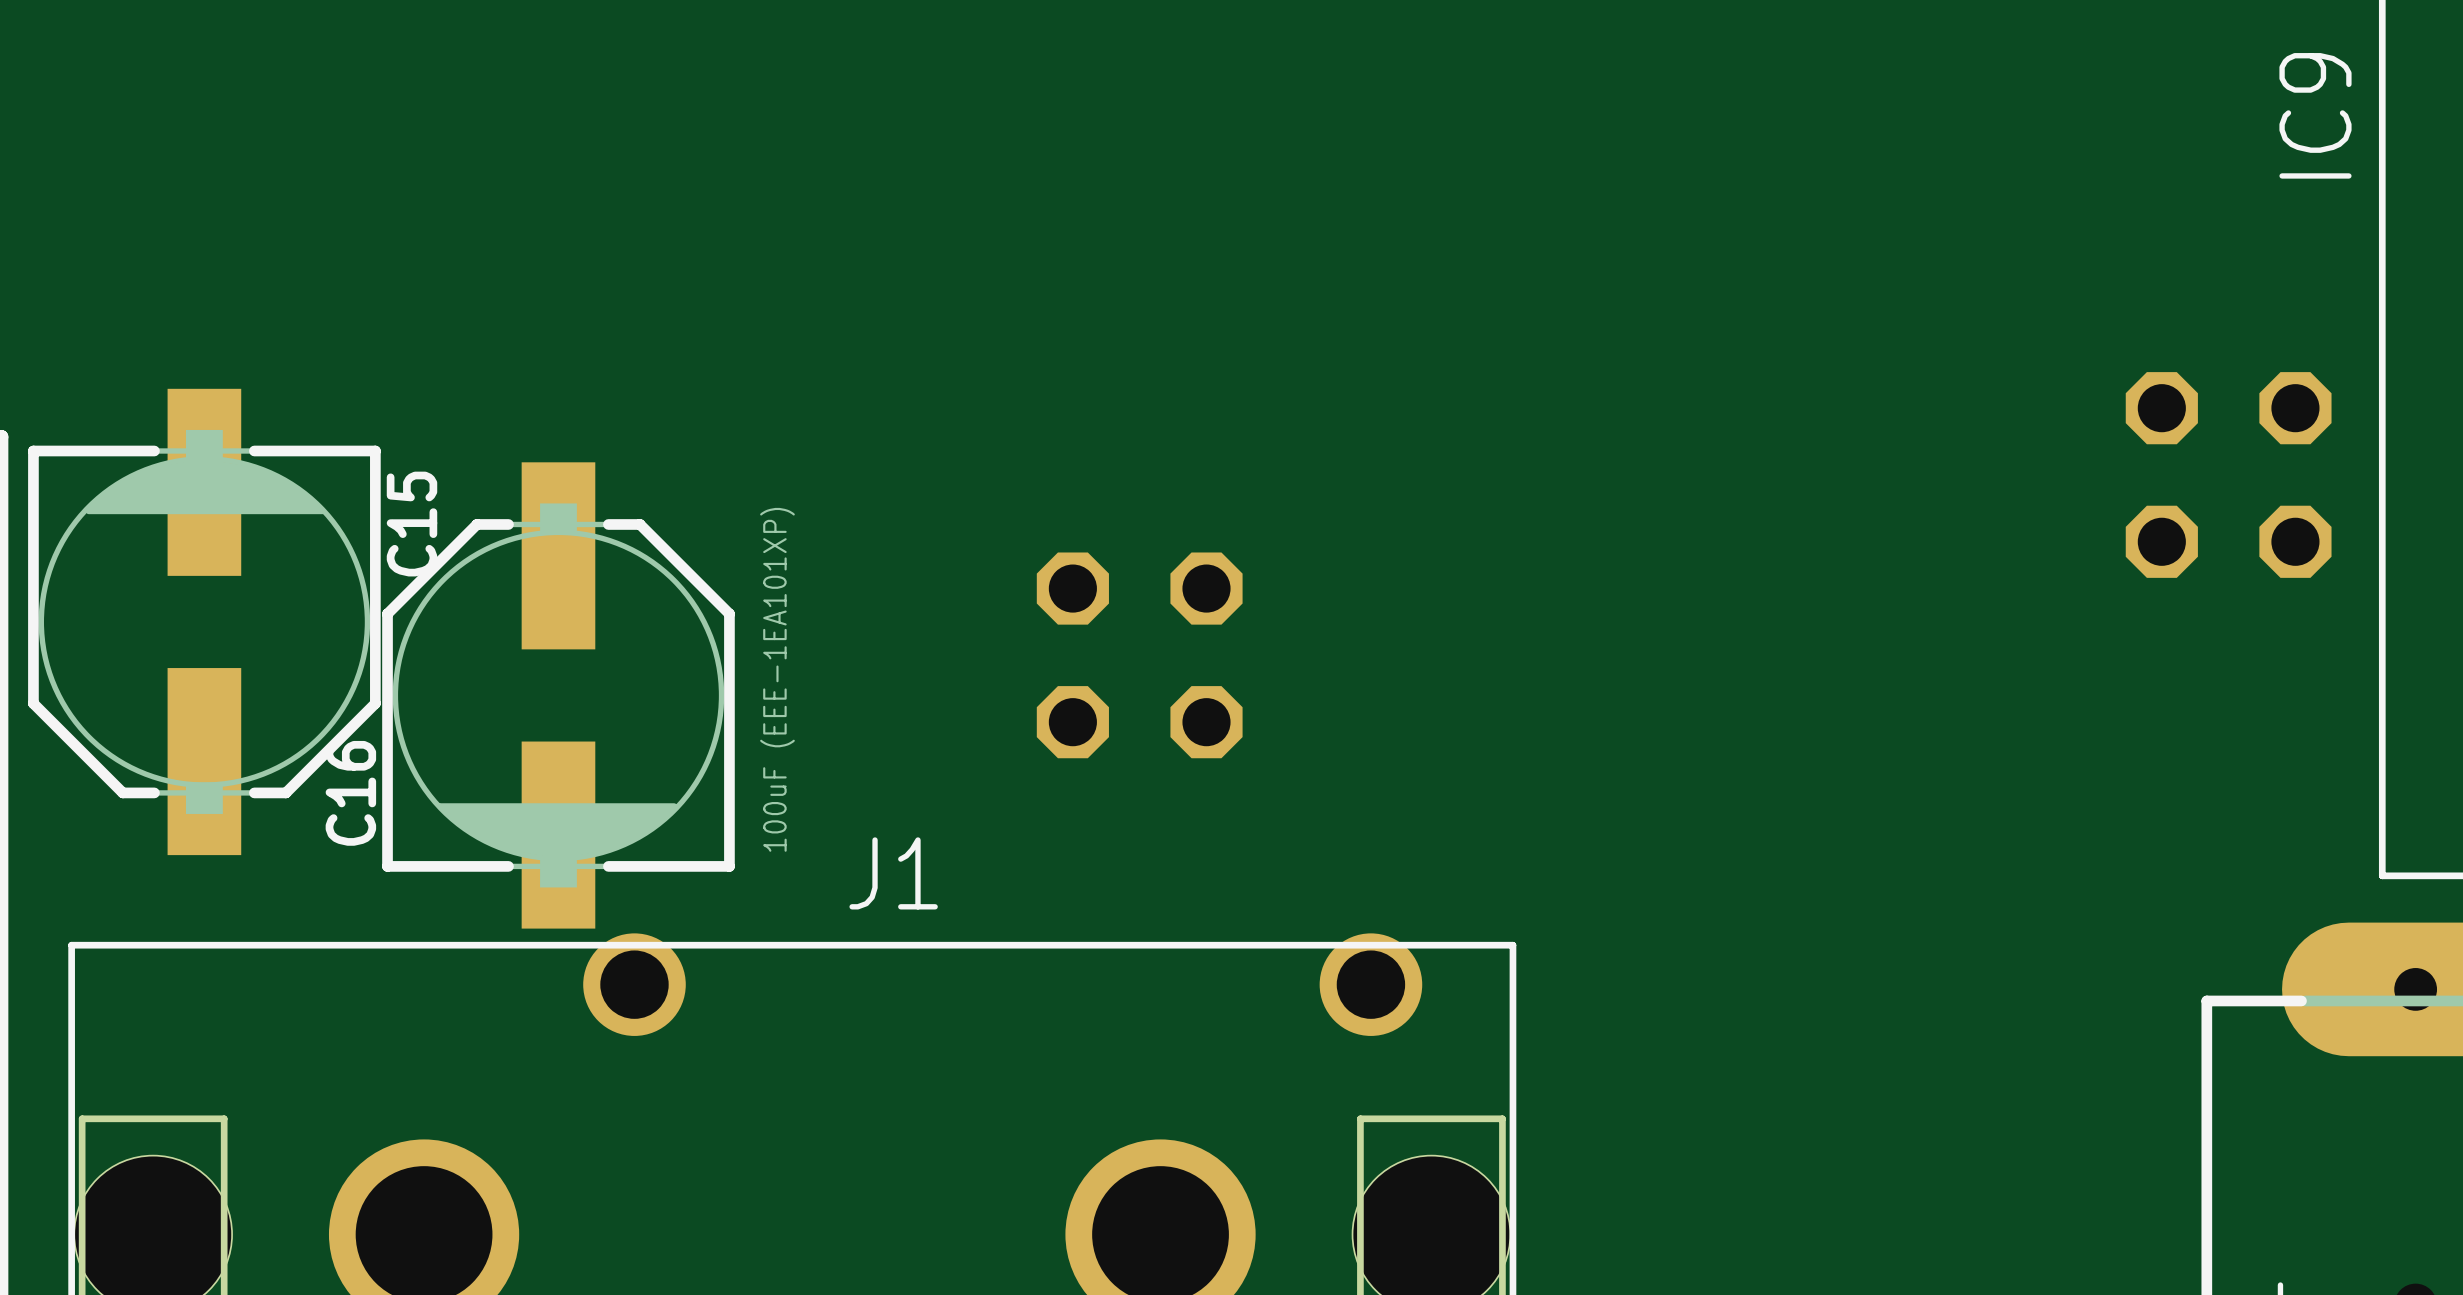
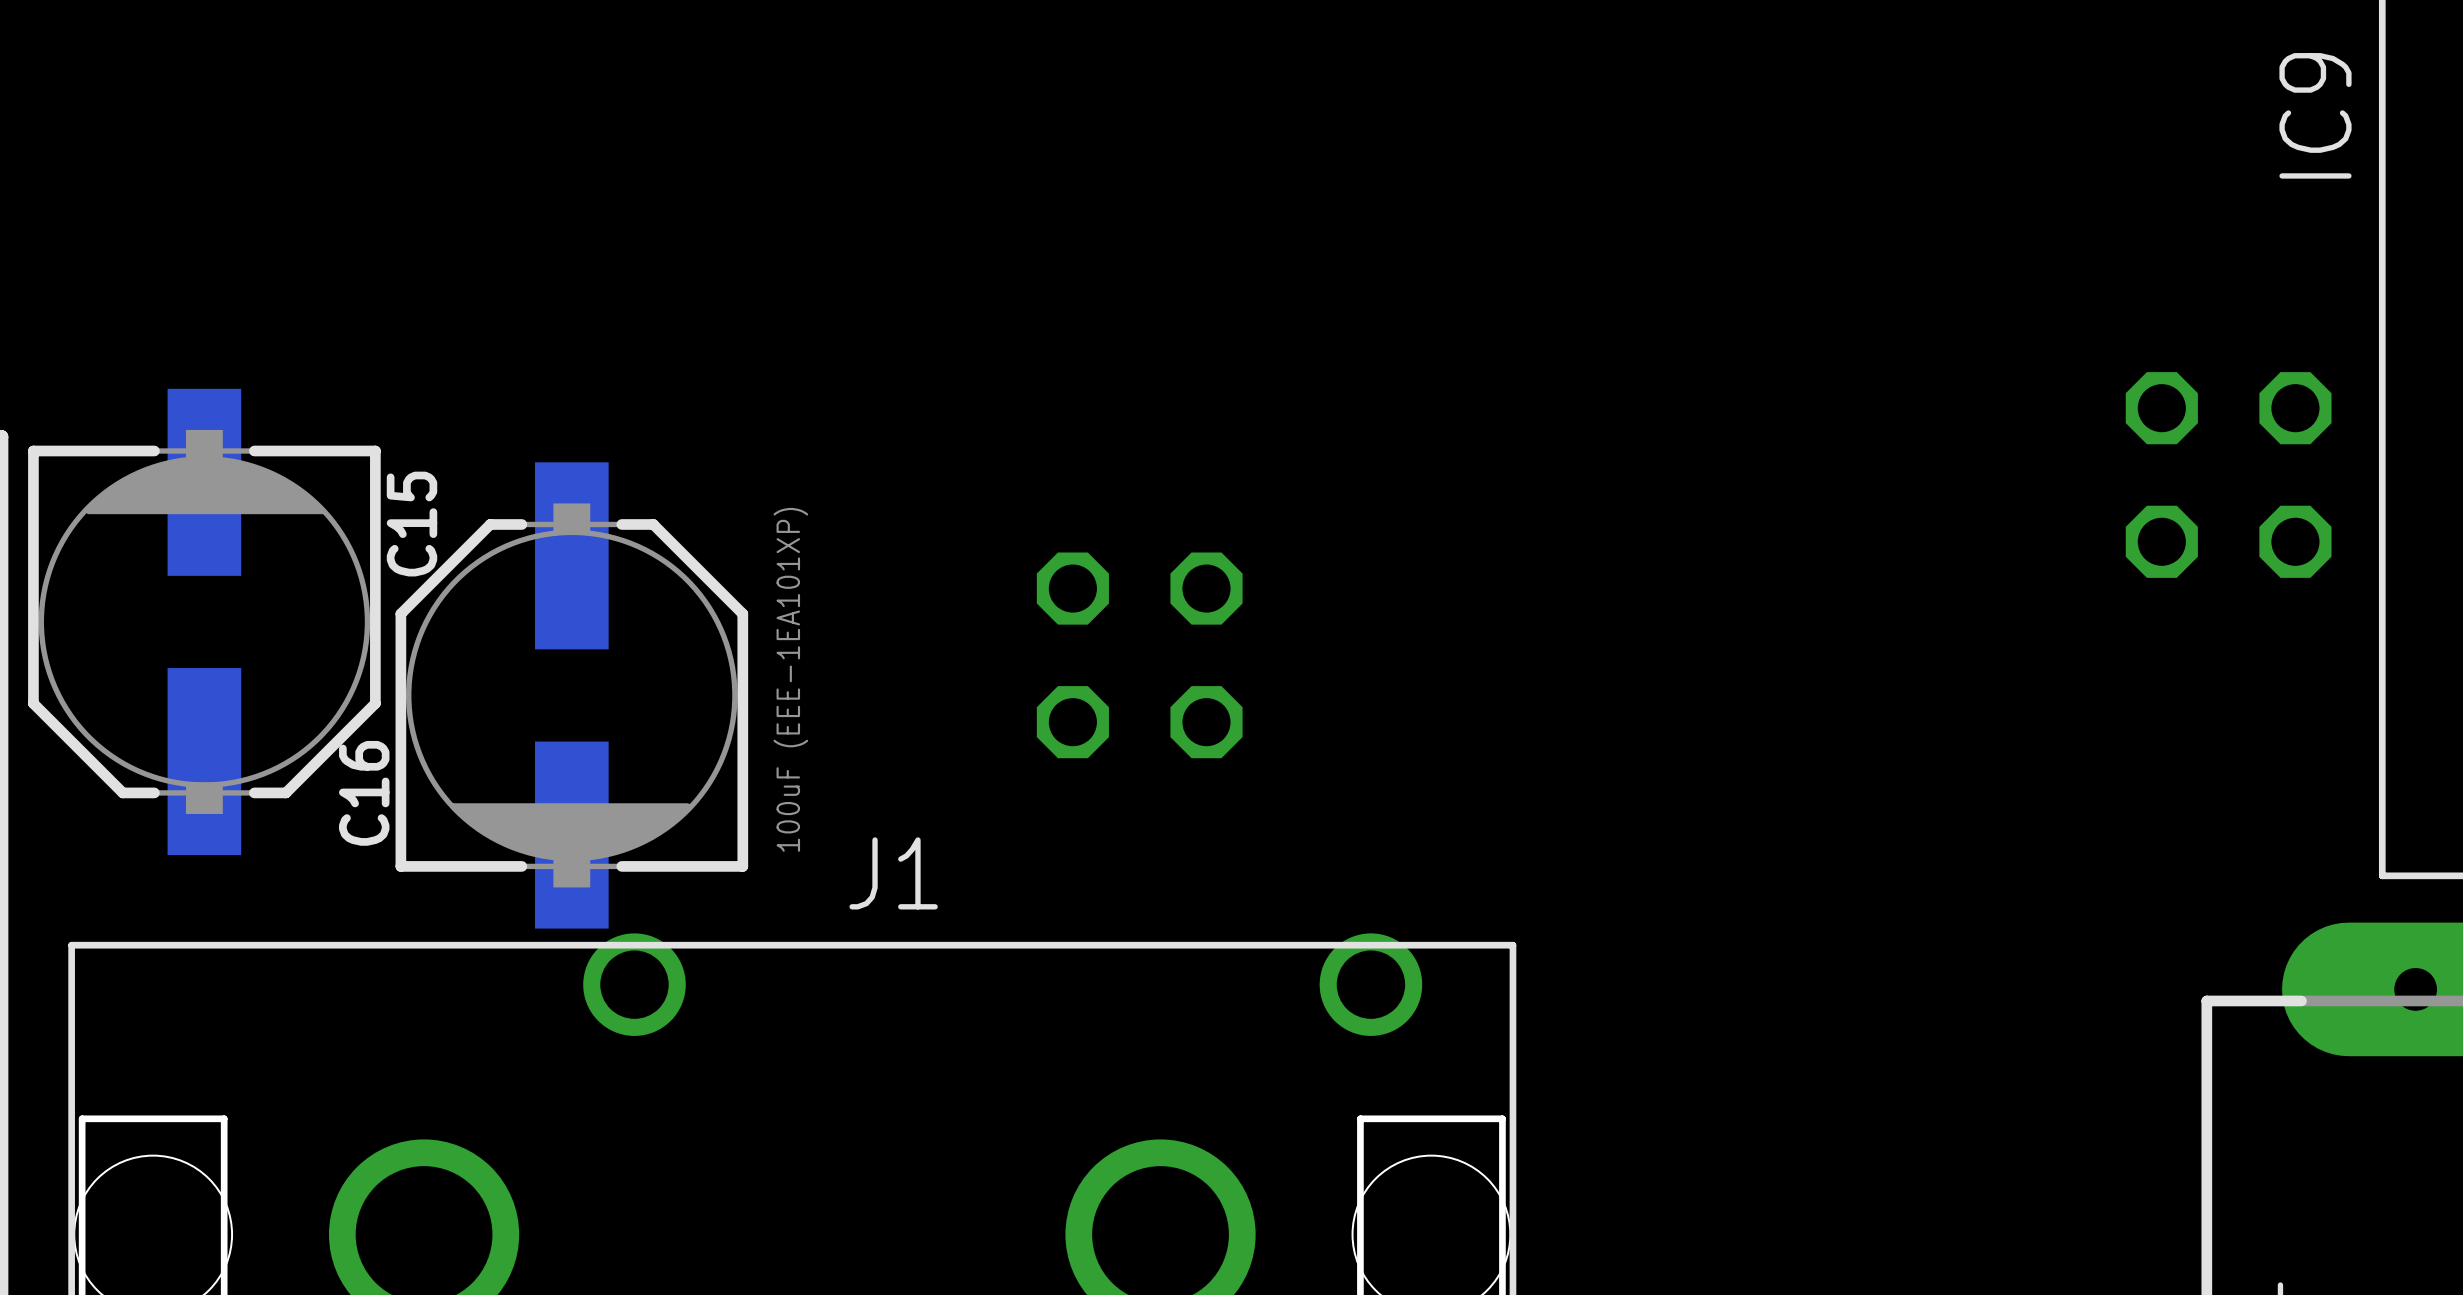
C16 position: (558, 695) -> (571, 695)

